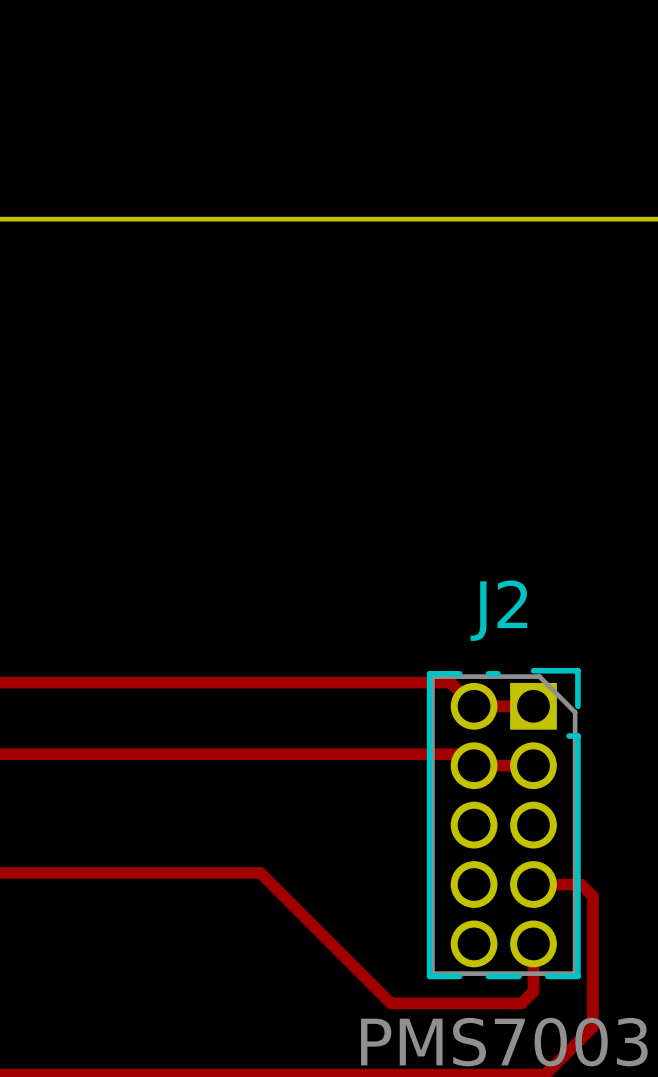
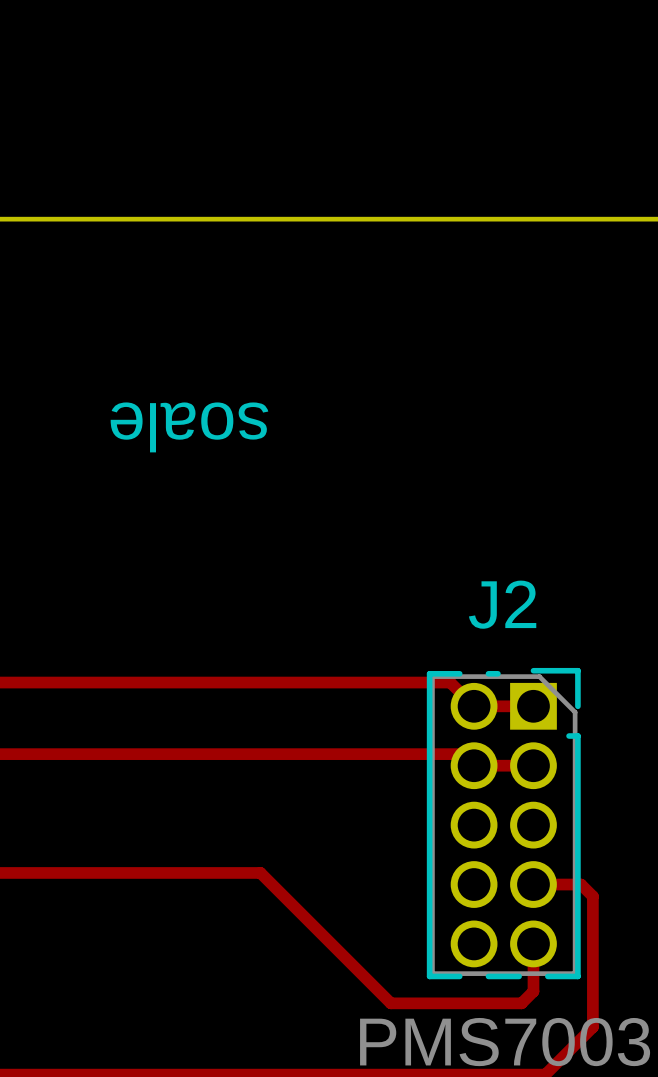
text: none -> soale (189, 427)

